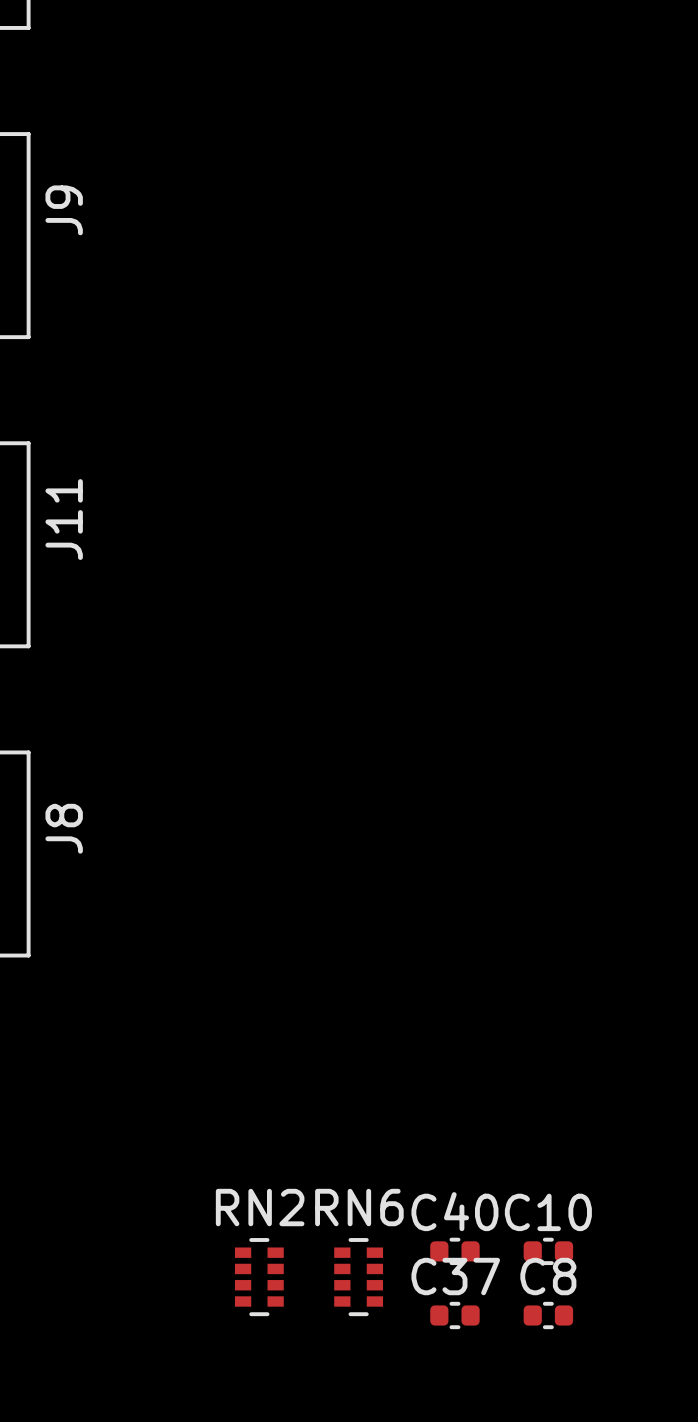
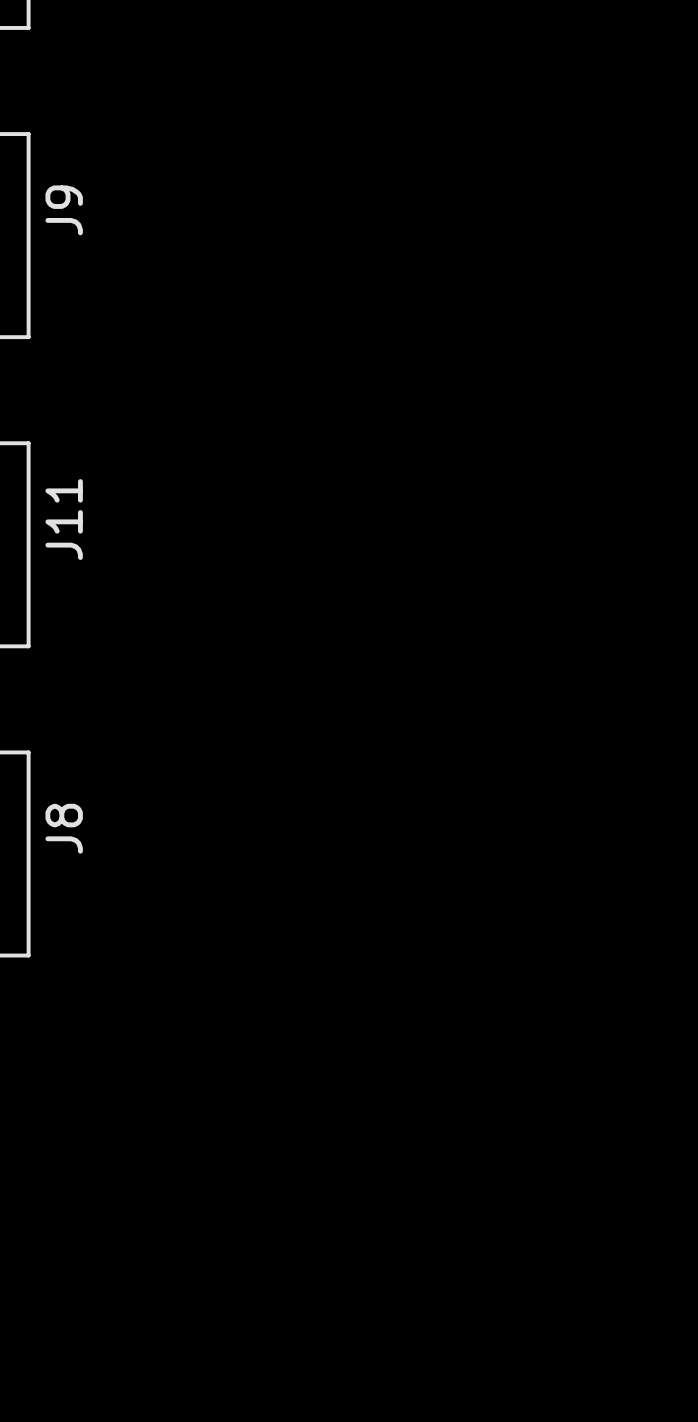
C40: (454, 1251) -> none
C10: (548, 1251) -> none
RN2: (259, 1277) -> none
RN6: (358, 1277) -> none
C37: (454, 1315) -> none
C8: (548, 1315) -> none

